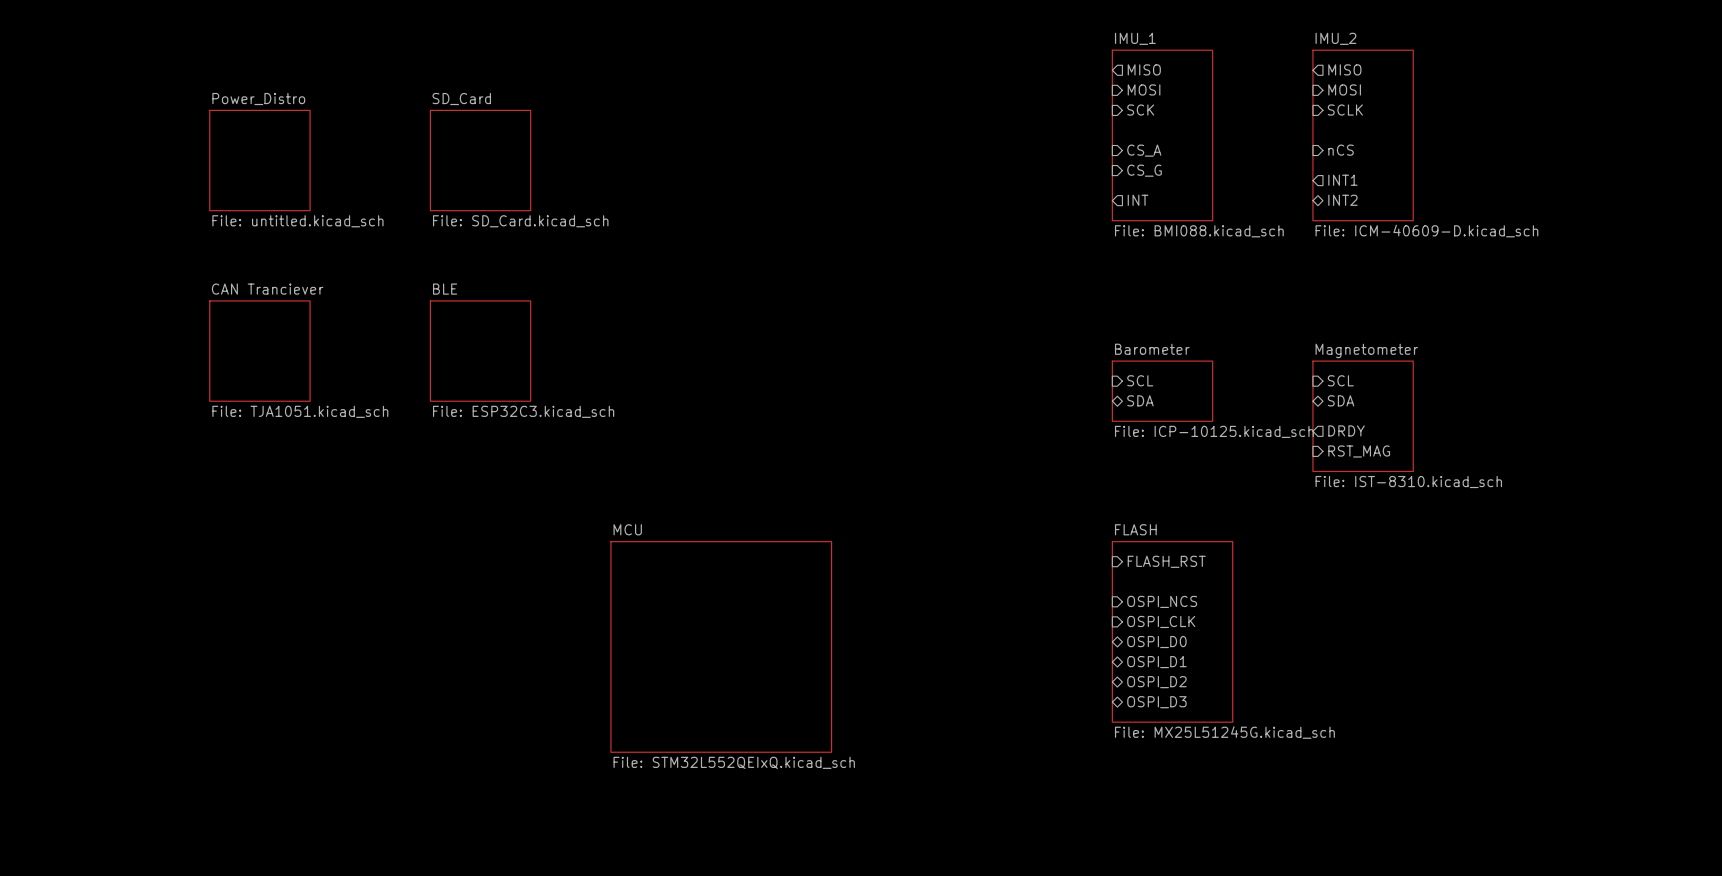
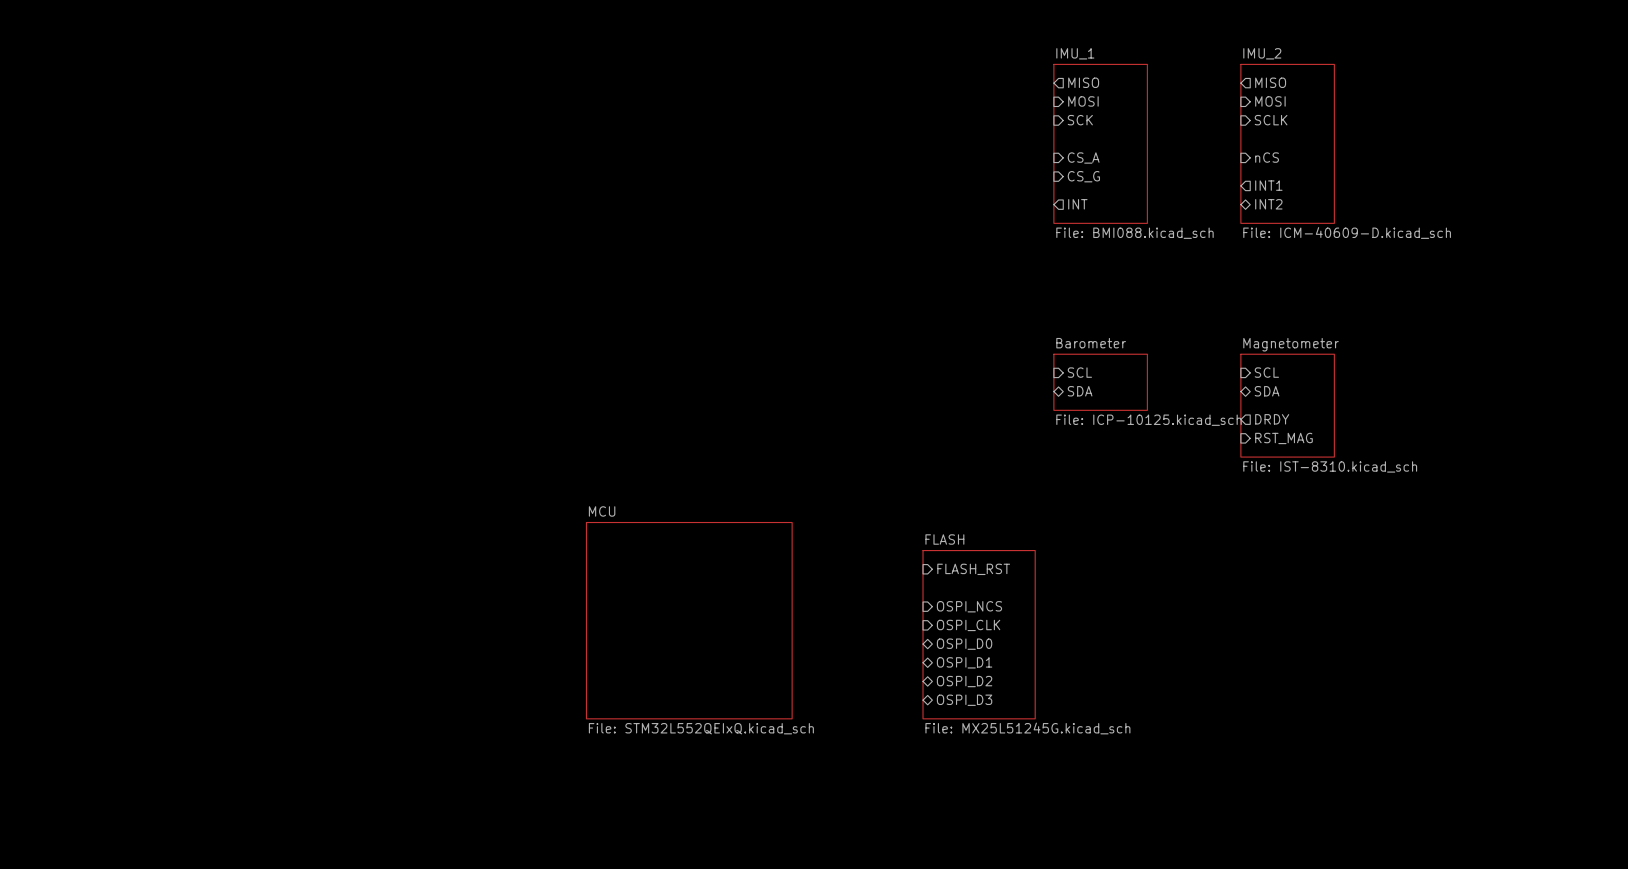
sheet Power_Distro: File: untitled.kicad_sch (259, 160) -> none
sheet SD_Card: File: SD_Card.kicad_sch (480, 160) -> none
sheet CAN Tranciever: File: TJA1051.kicad_sch (259, 351) -> none
sheet BLE: File: ESP32C3.kicad_sch (480, 351) -> none
sheet pin position: FLASH_RST (1166, 561) -> FLASH_RST (973, 569)
sheet pin position: OSPI_NCS (1162, 601) -> OSPI_NCS (969, 606)
sheet pin position: OSPI_CLK (1161, 621) -> OSPI_CLK (968, 625)
sheet FLASH position: (1172, 631) -> (979, 634)
sheet pin position: OSPI_D0 (1156, 642) -> OSPI_D0 (964, 644)
sheet pin position: OSPI_D1 (1156, 662) -> OSPI_D1 (964, 662)
sheet pin position: OSPI_D2 (1156, 682) -> OSPI_D2 (964, 681)
sheet pin position: OSPI_D3 (1156, 702) -> OSPI_D3 (964, 700)

